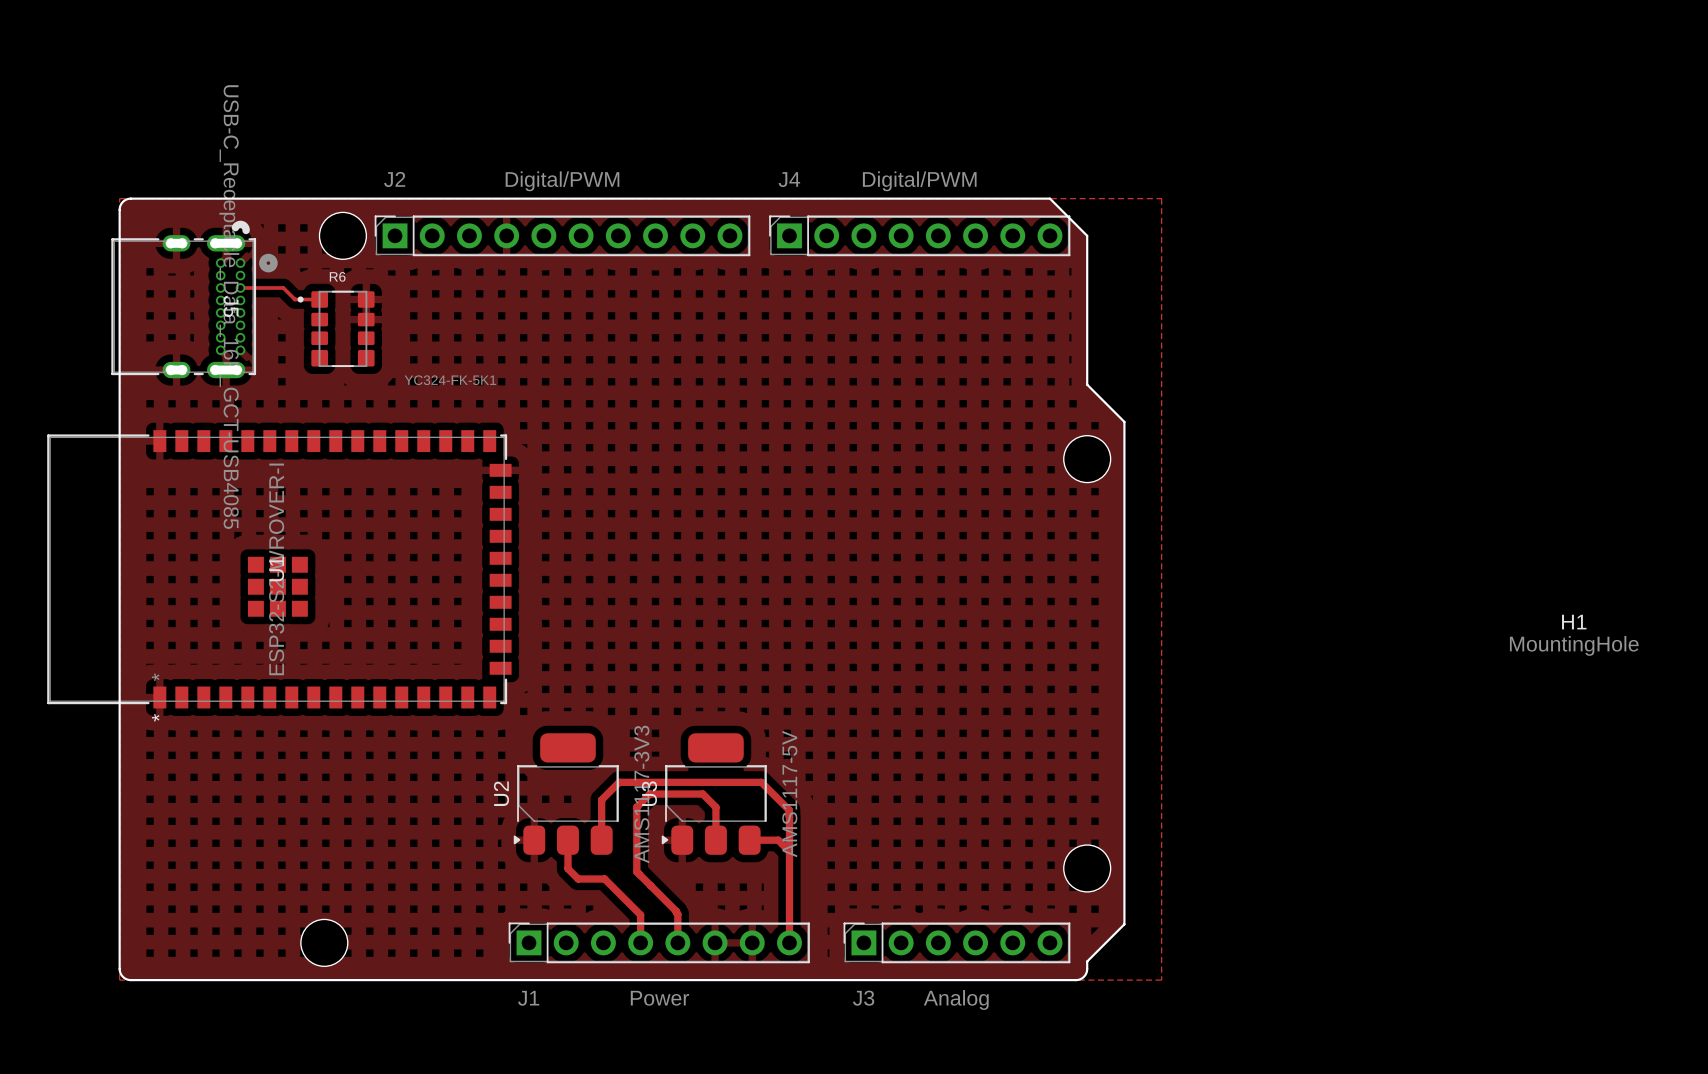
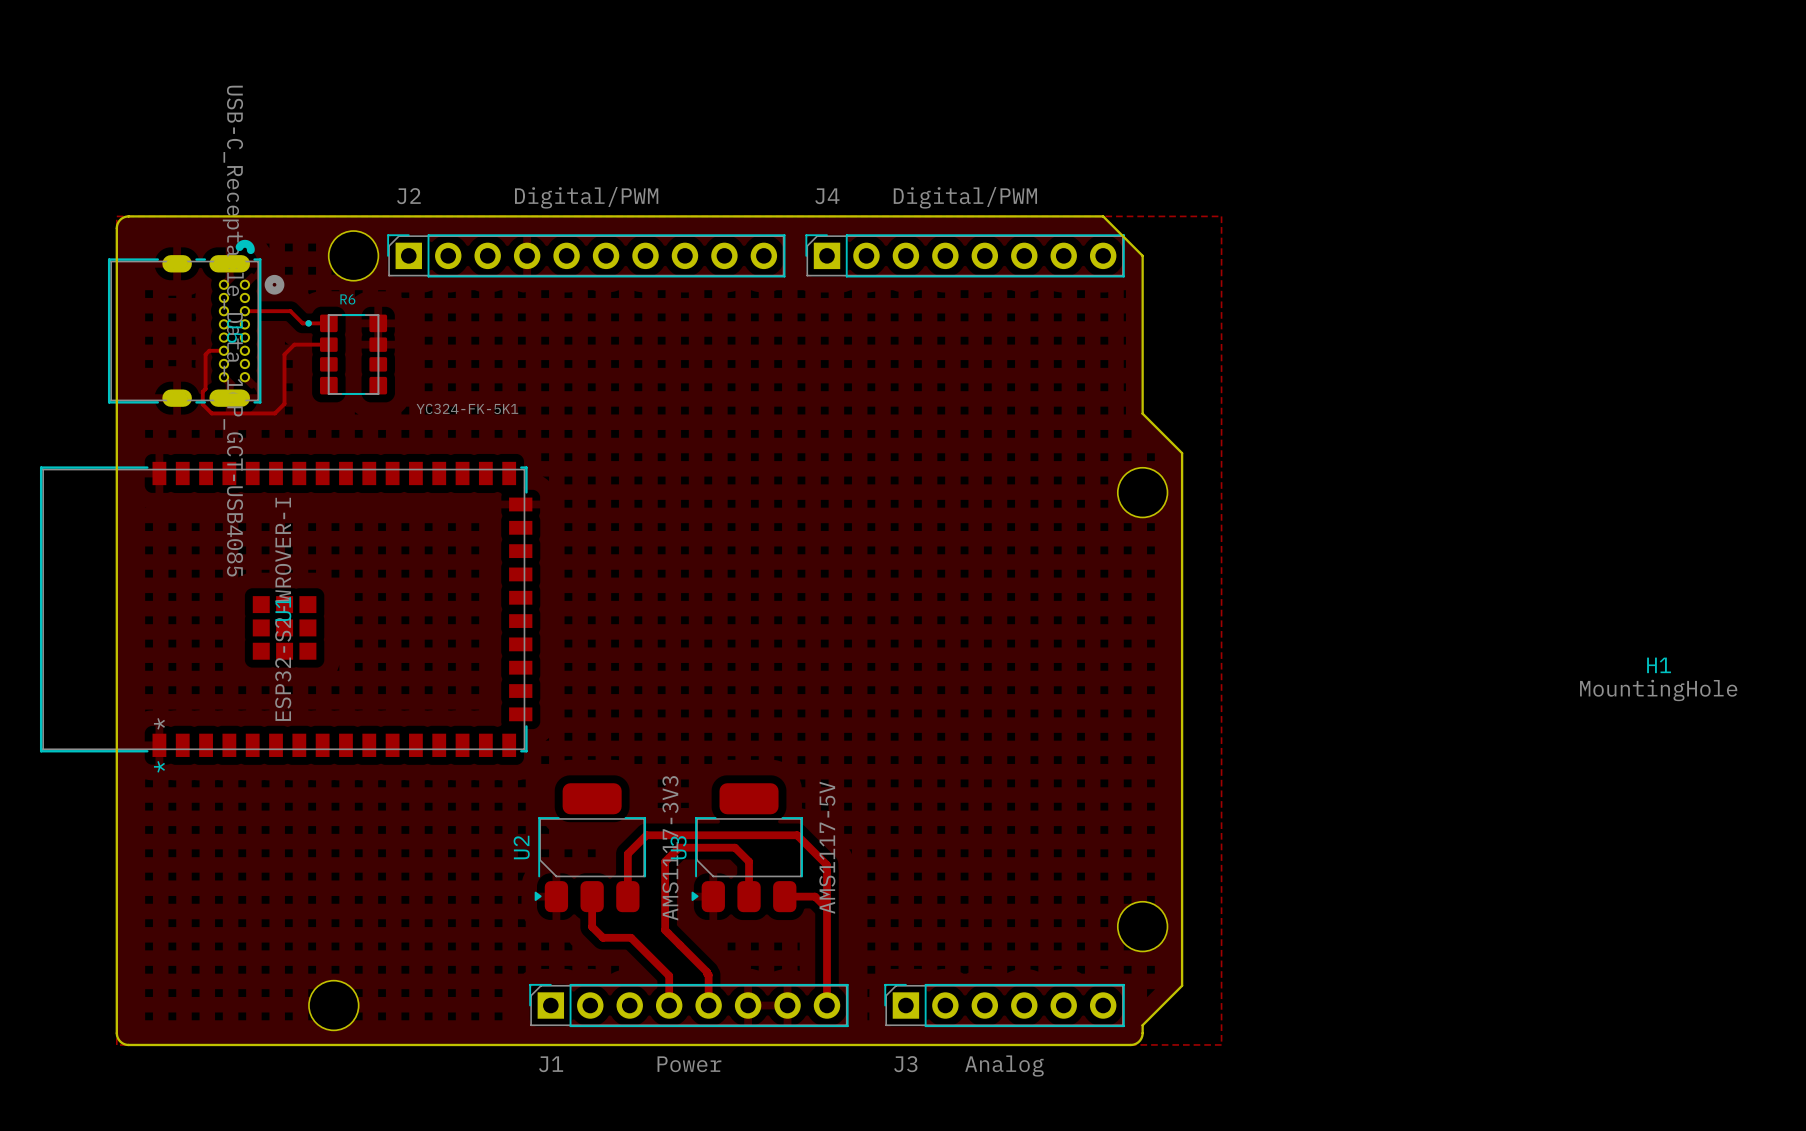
track: none -> (328, 344) (294, 344) (284, 354) (284, 403) (274, 413) (211, 413) (202, 404) (202, 391) (205, 389) (205, 354) (209, 350) (223, 350)

